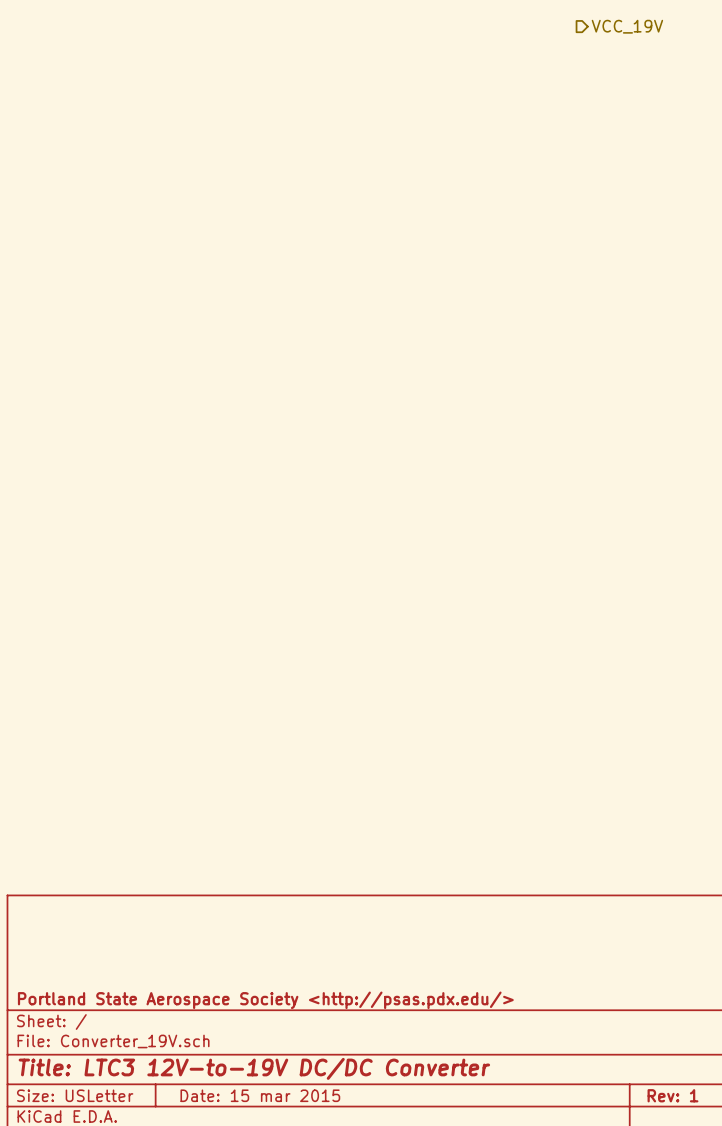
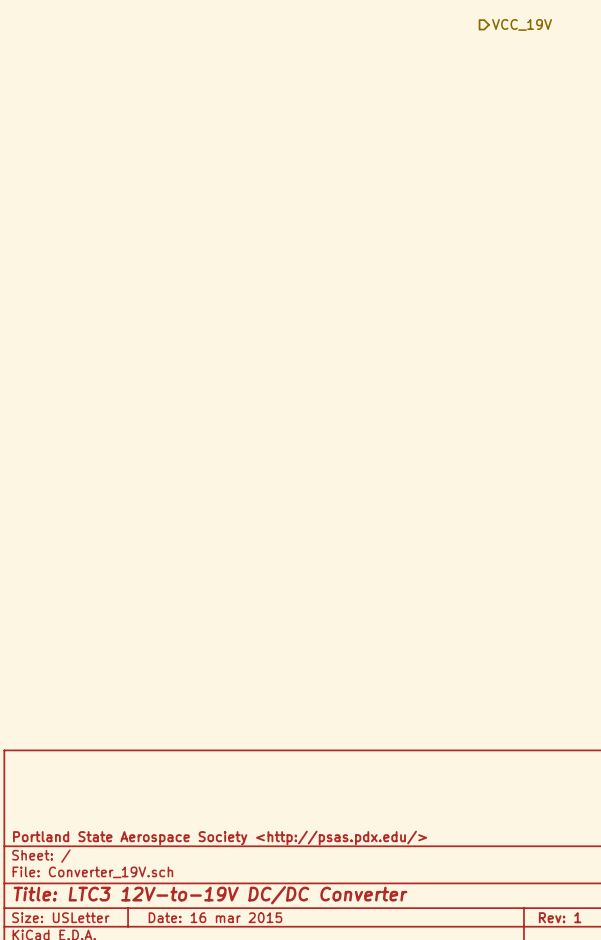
title block: Date: 15 mar 2015 (260, 1095) -> Date: 16 mar 2015 (215, 917)

